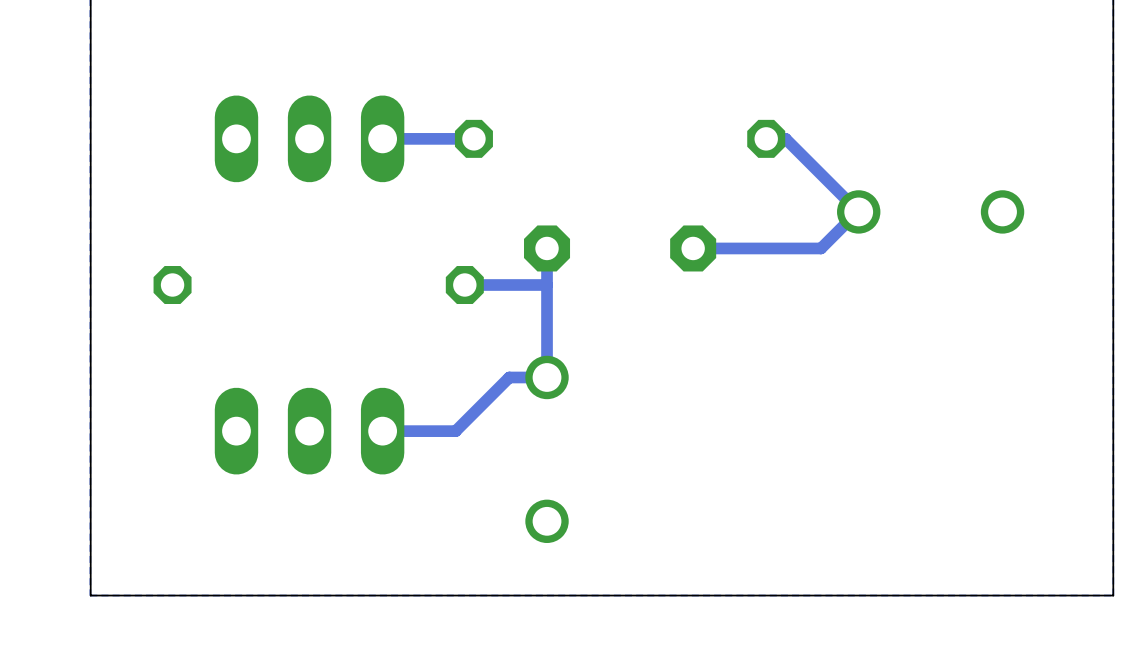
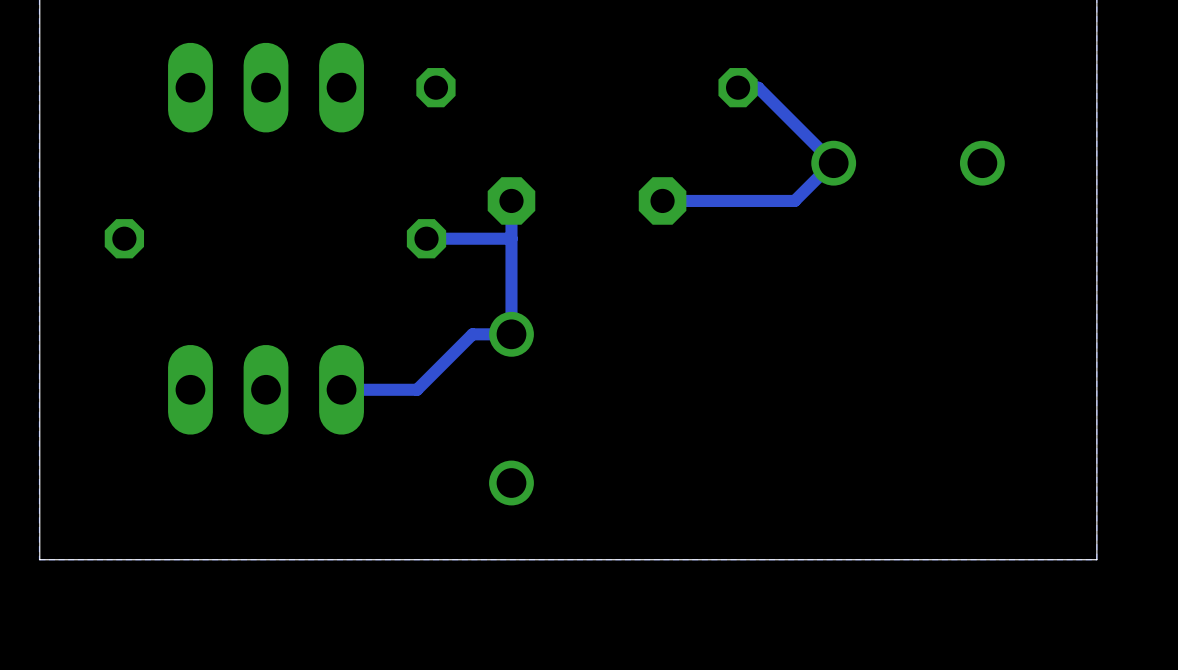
bottom track: (473, 138) (382, 138) -> none

